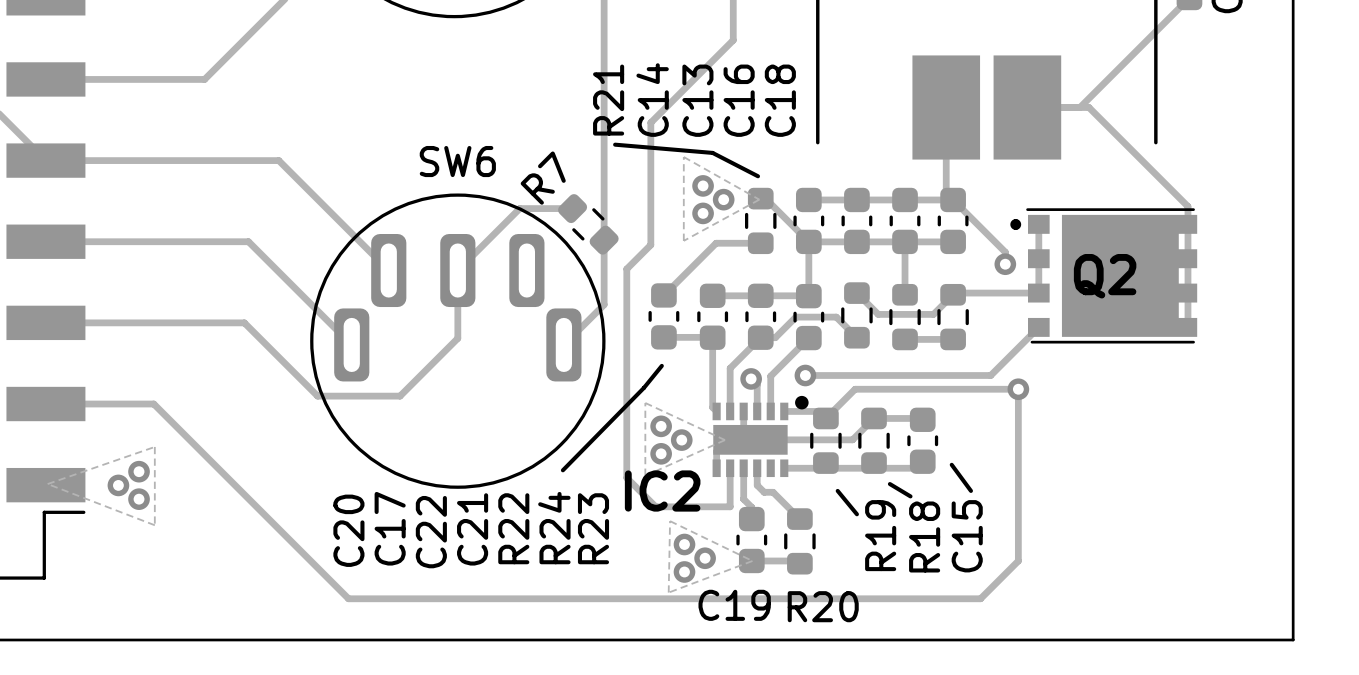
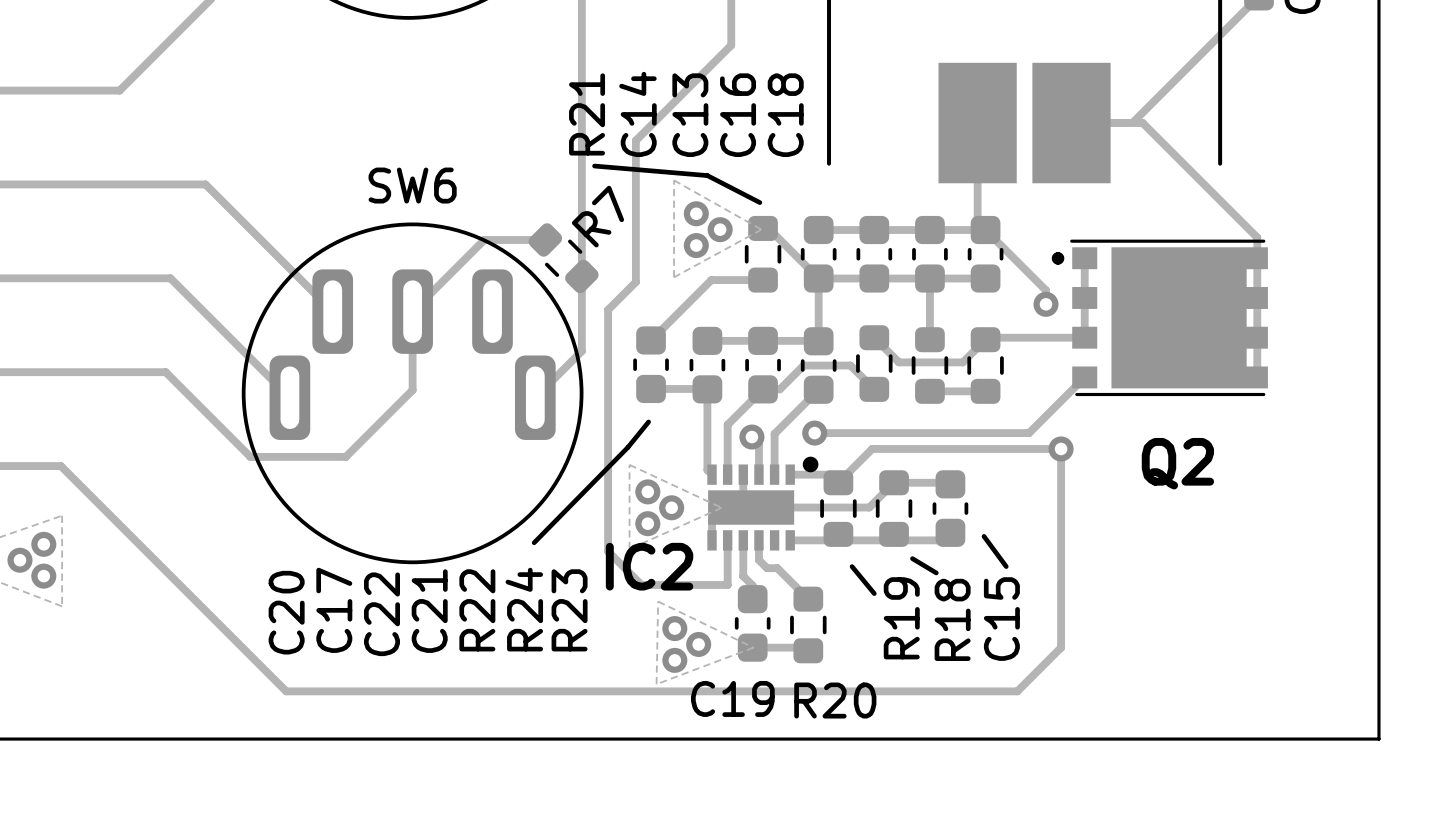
R7 name position: R7 (543, 178) -> R7 (598, 216)
Q2 name position: Q2 (1105, 276) -> Q2 (1177, 463)

